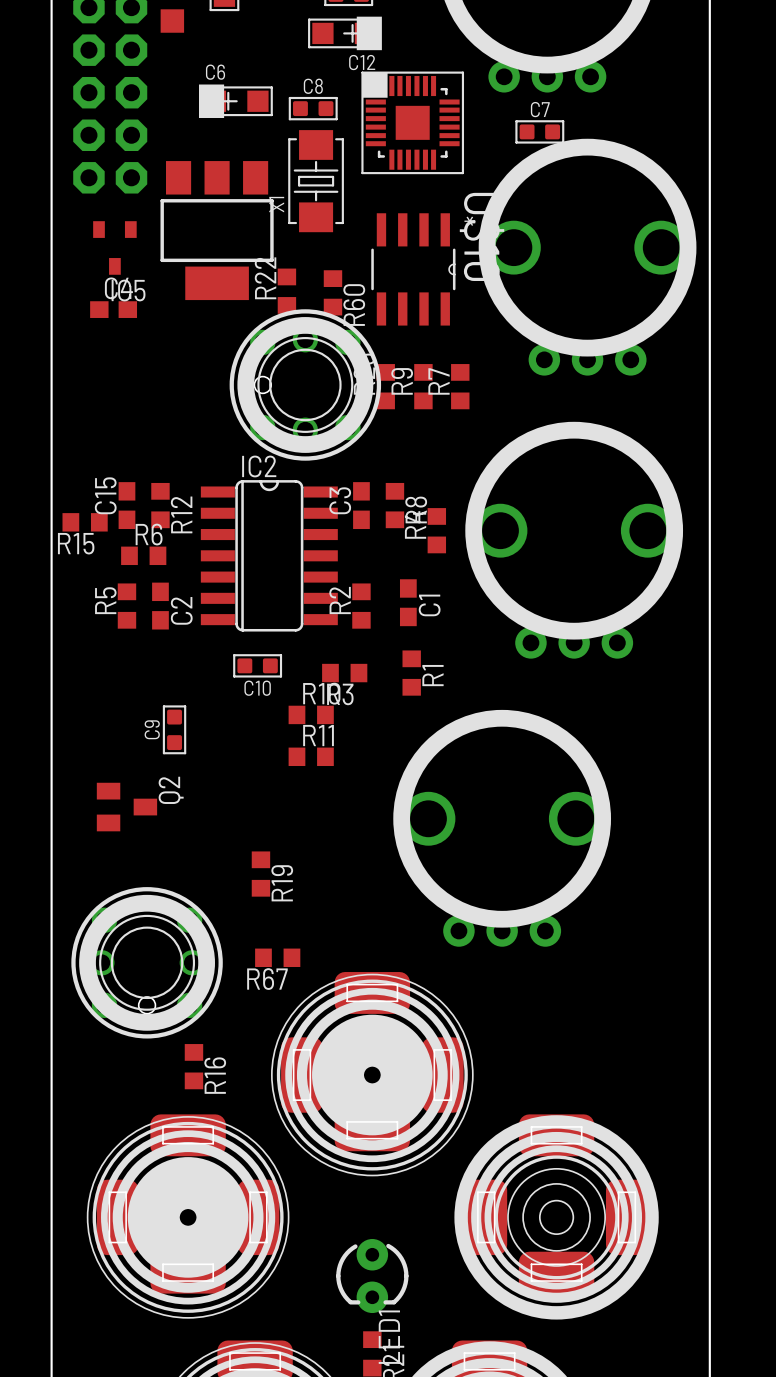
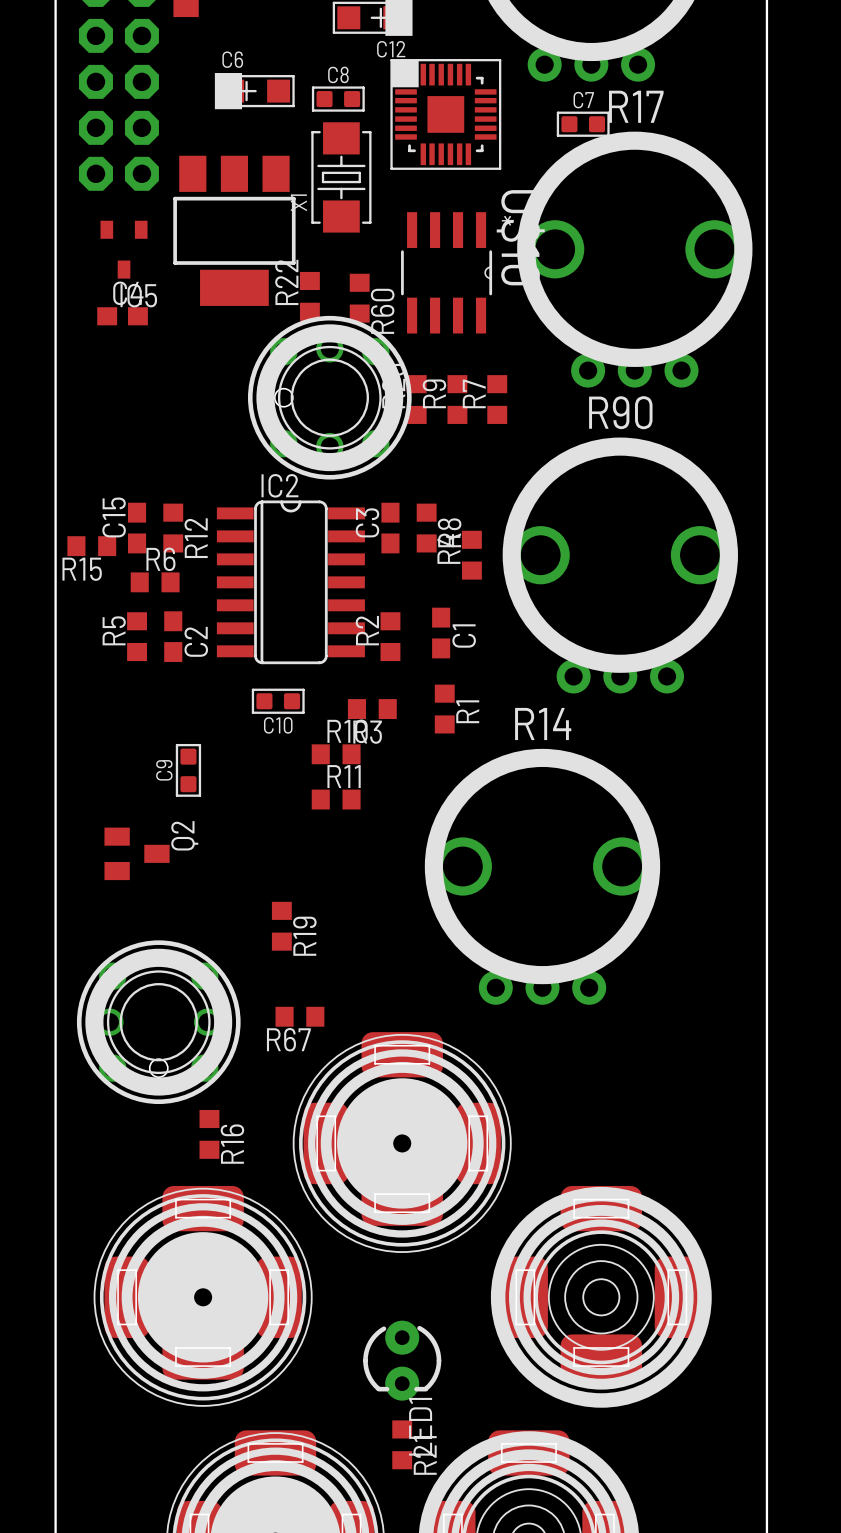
R17 name: none -> R17 (636, 106)
R90 name: none -> R90 (620, 412)
R14 name: none -> R14 (543, 724)

